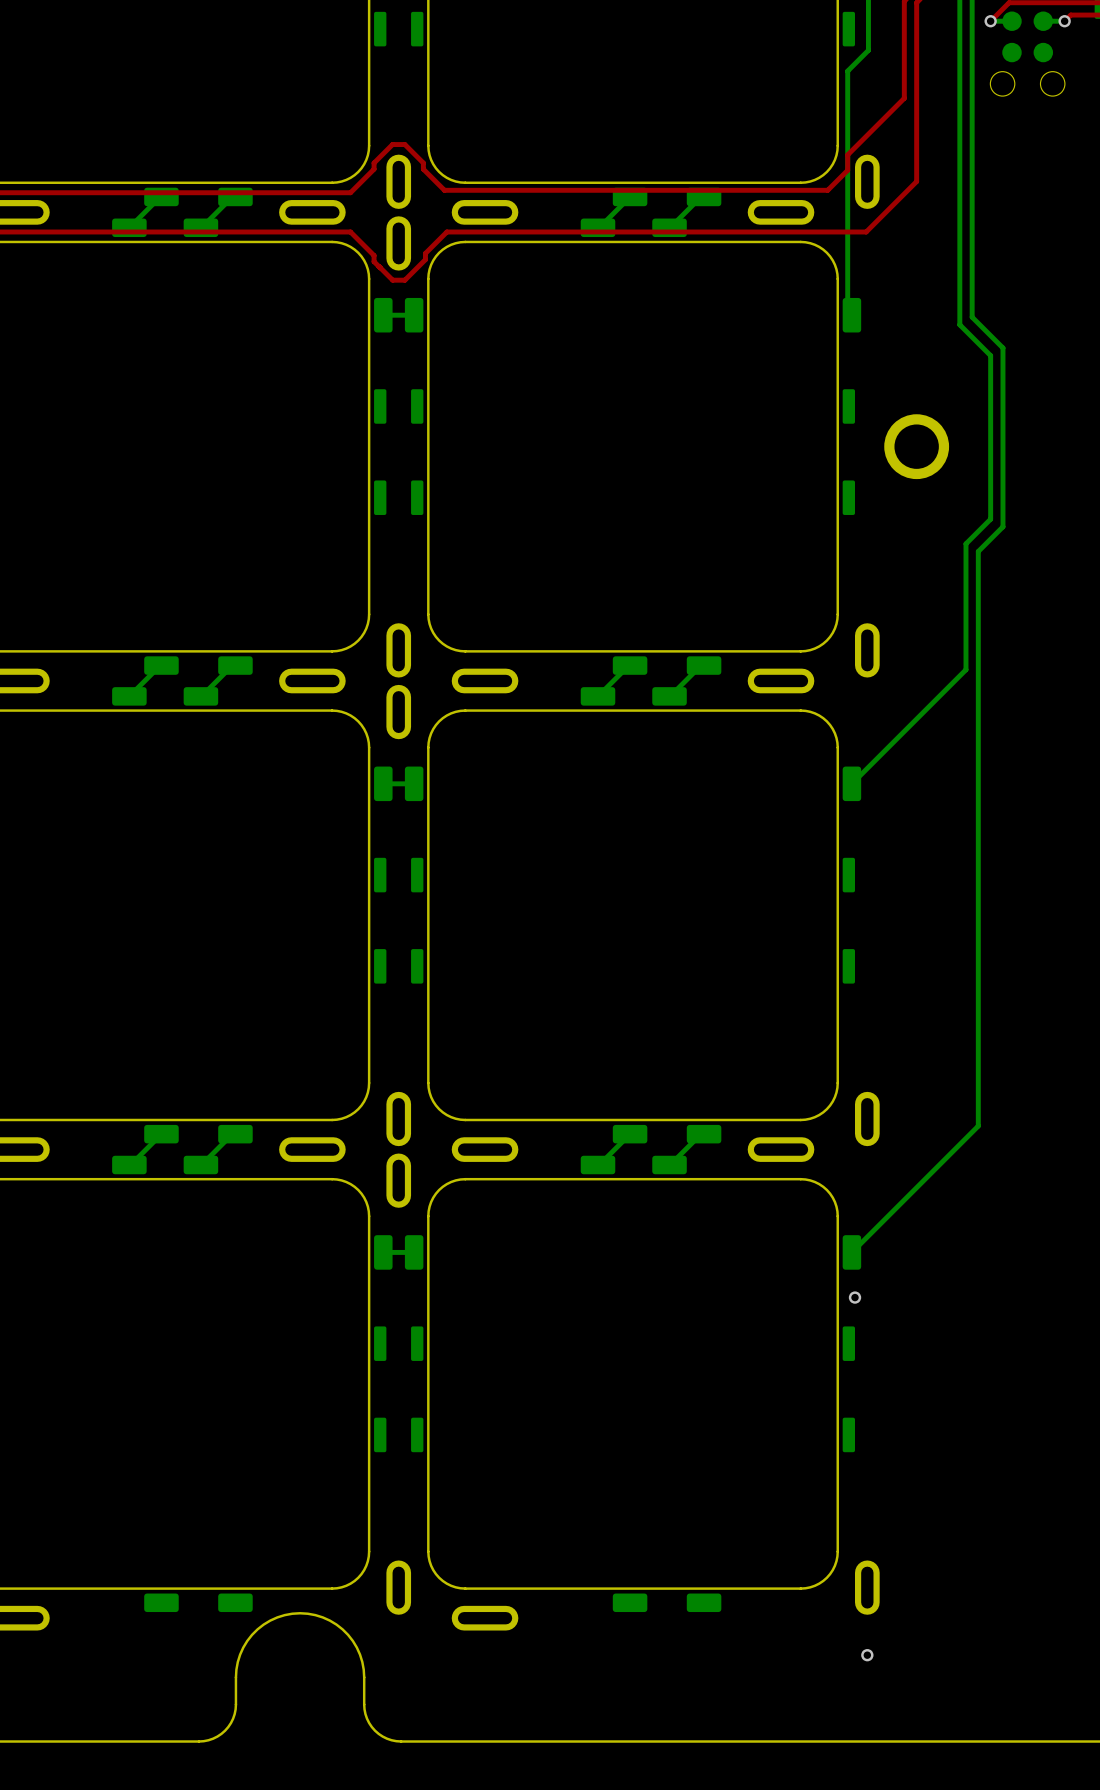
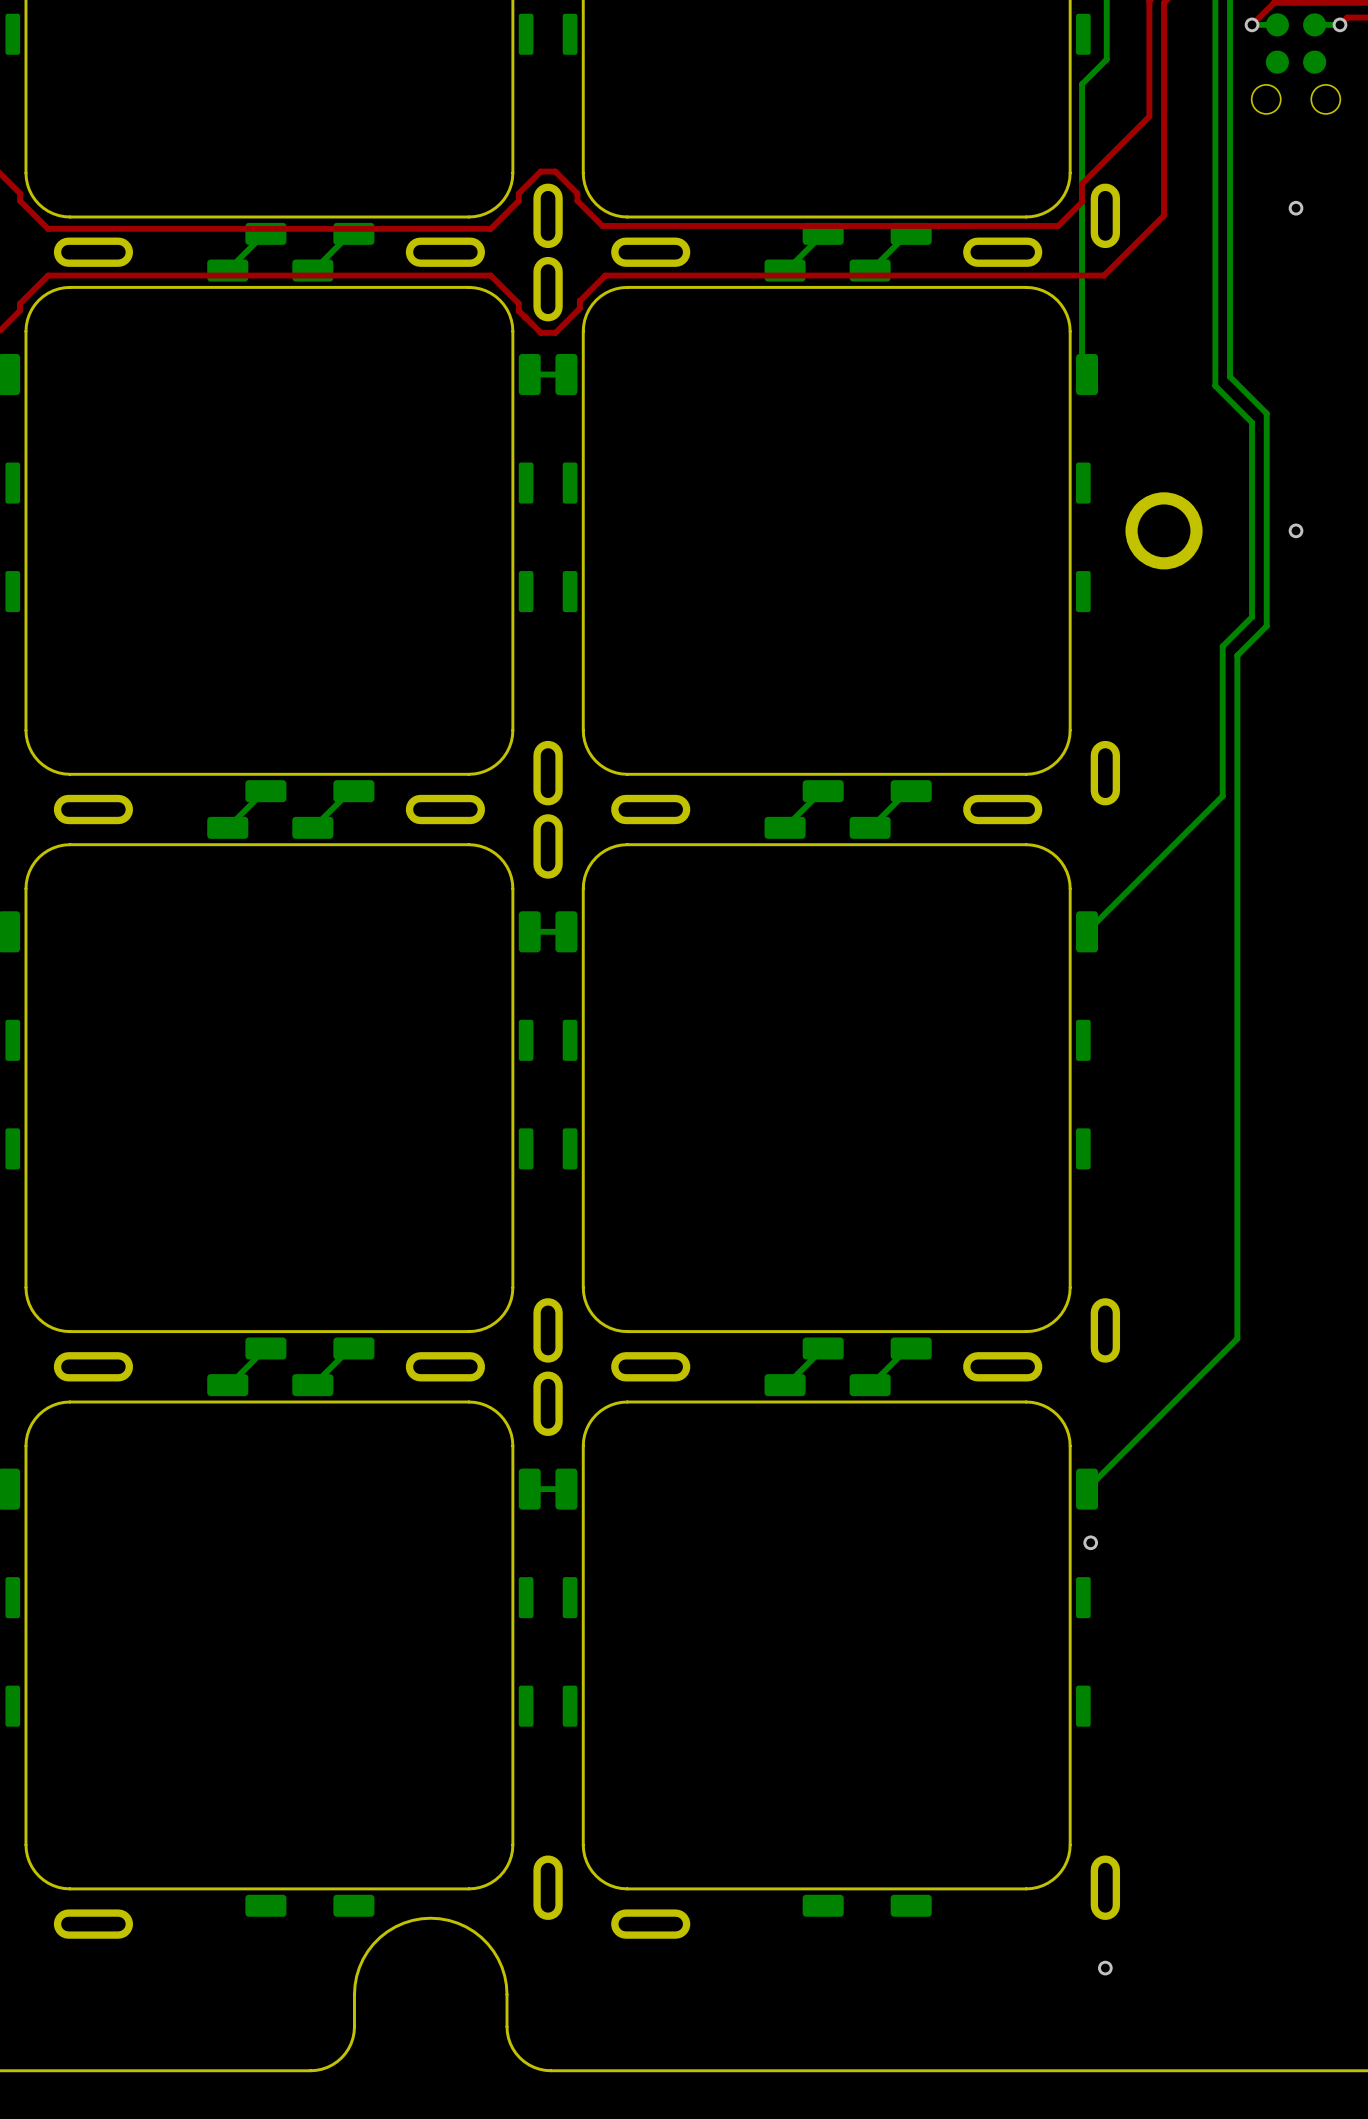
via: none -> (1296, 208)
via: none -> (1296, 530)

